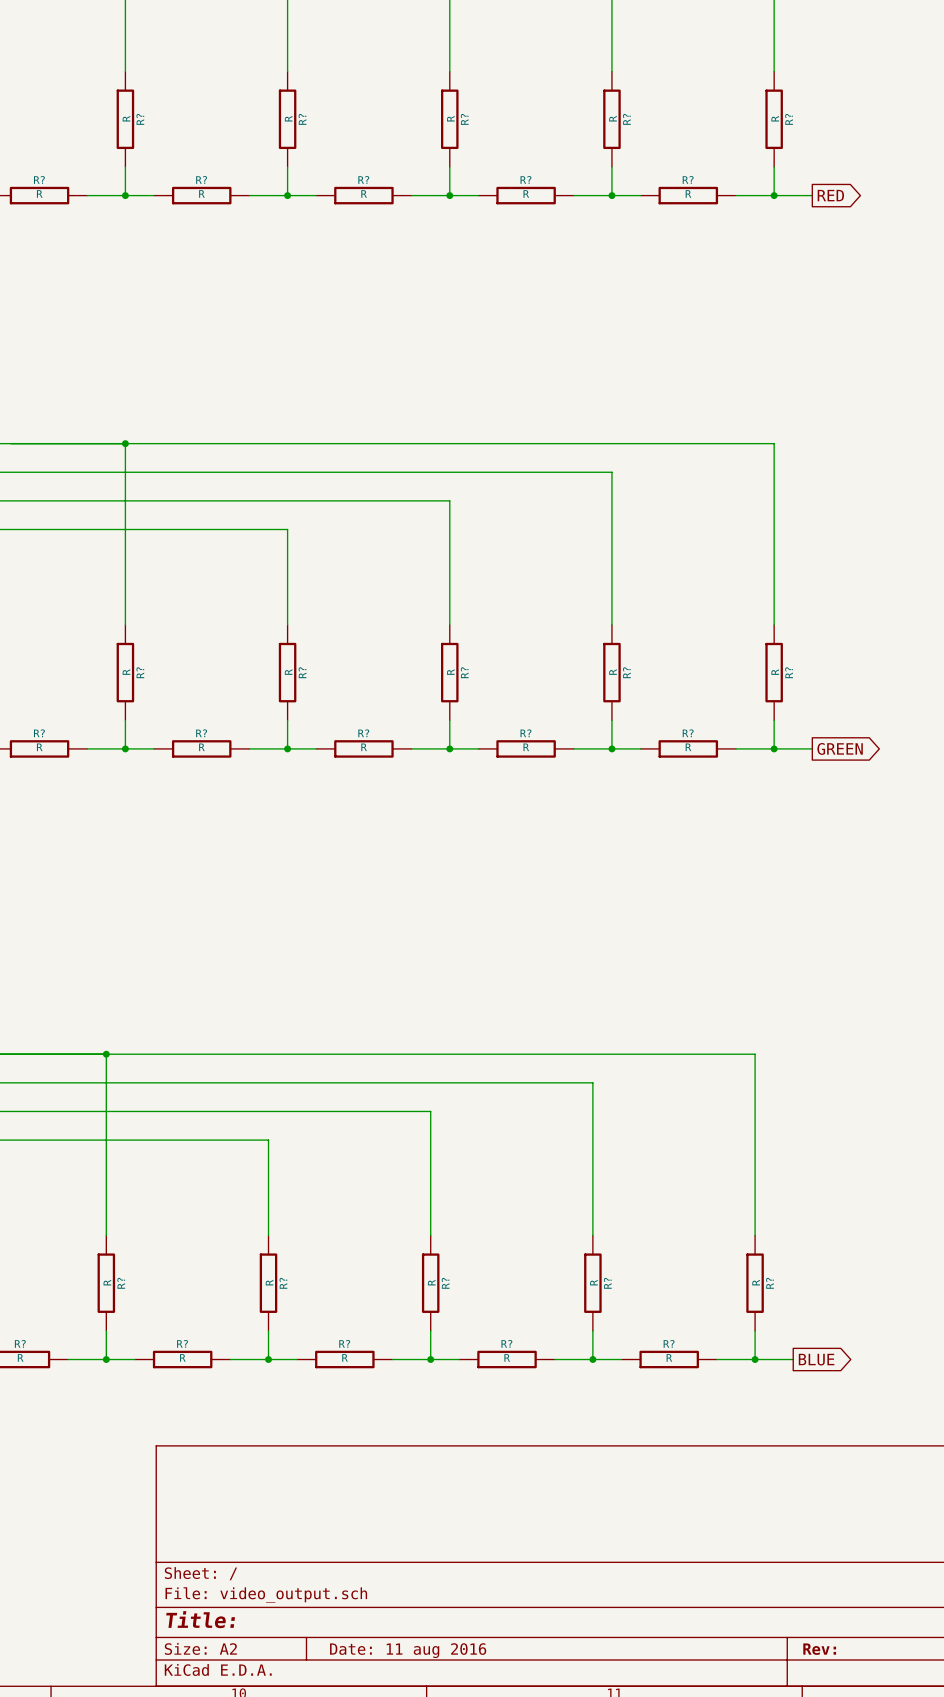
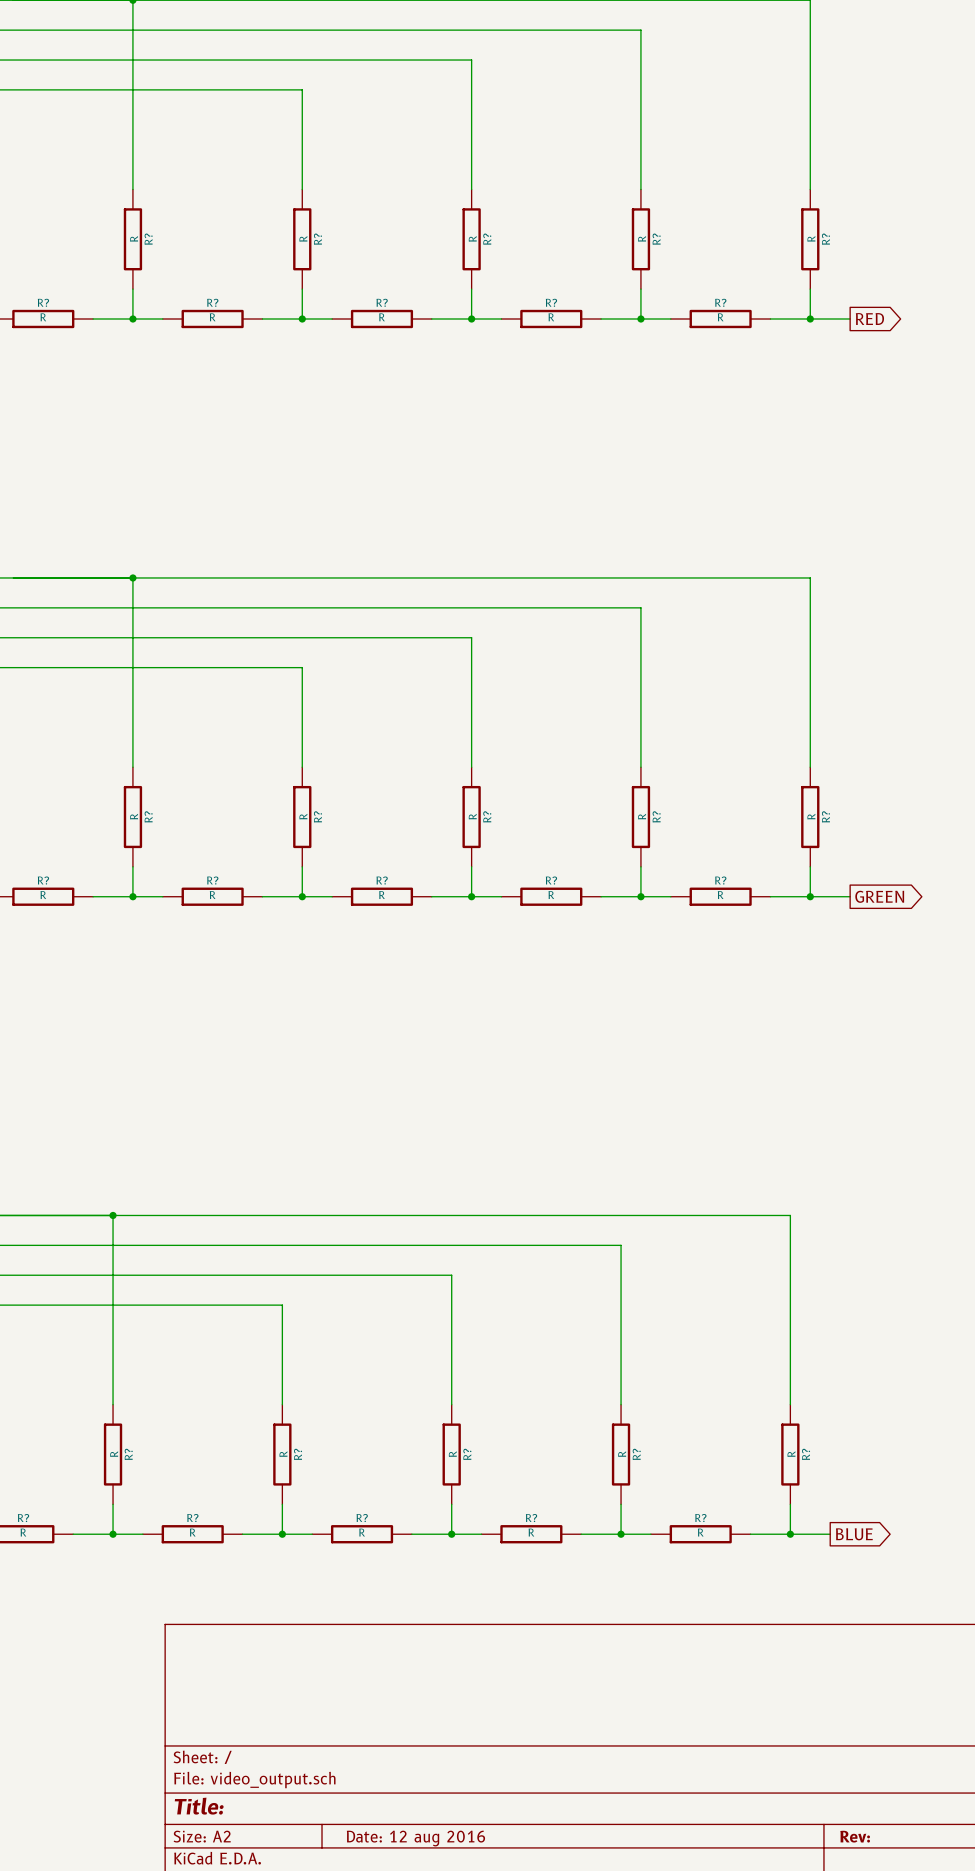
title block: Date: 11 aug 2016 (408, 1650) -> Date: 12 aug 2016 (415, 1838)

